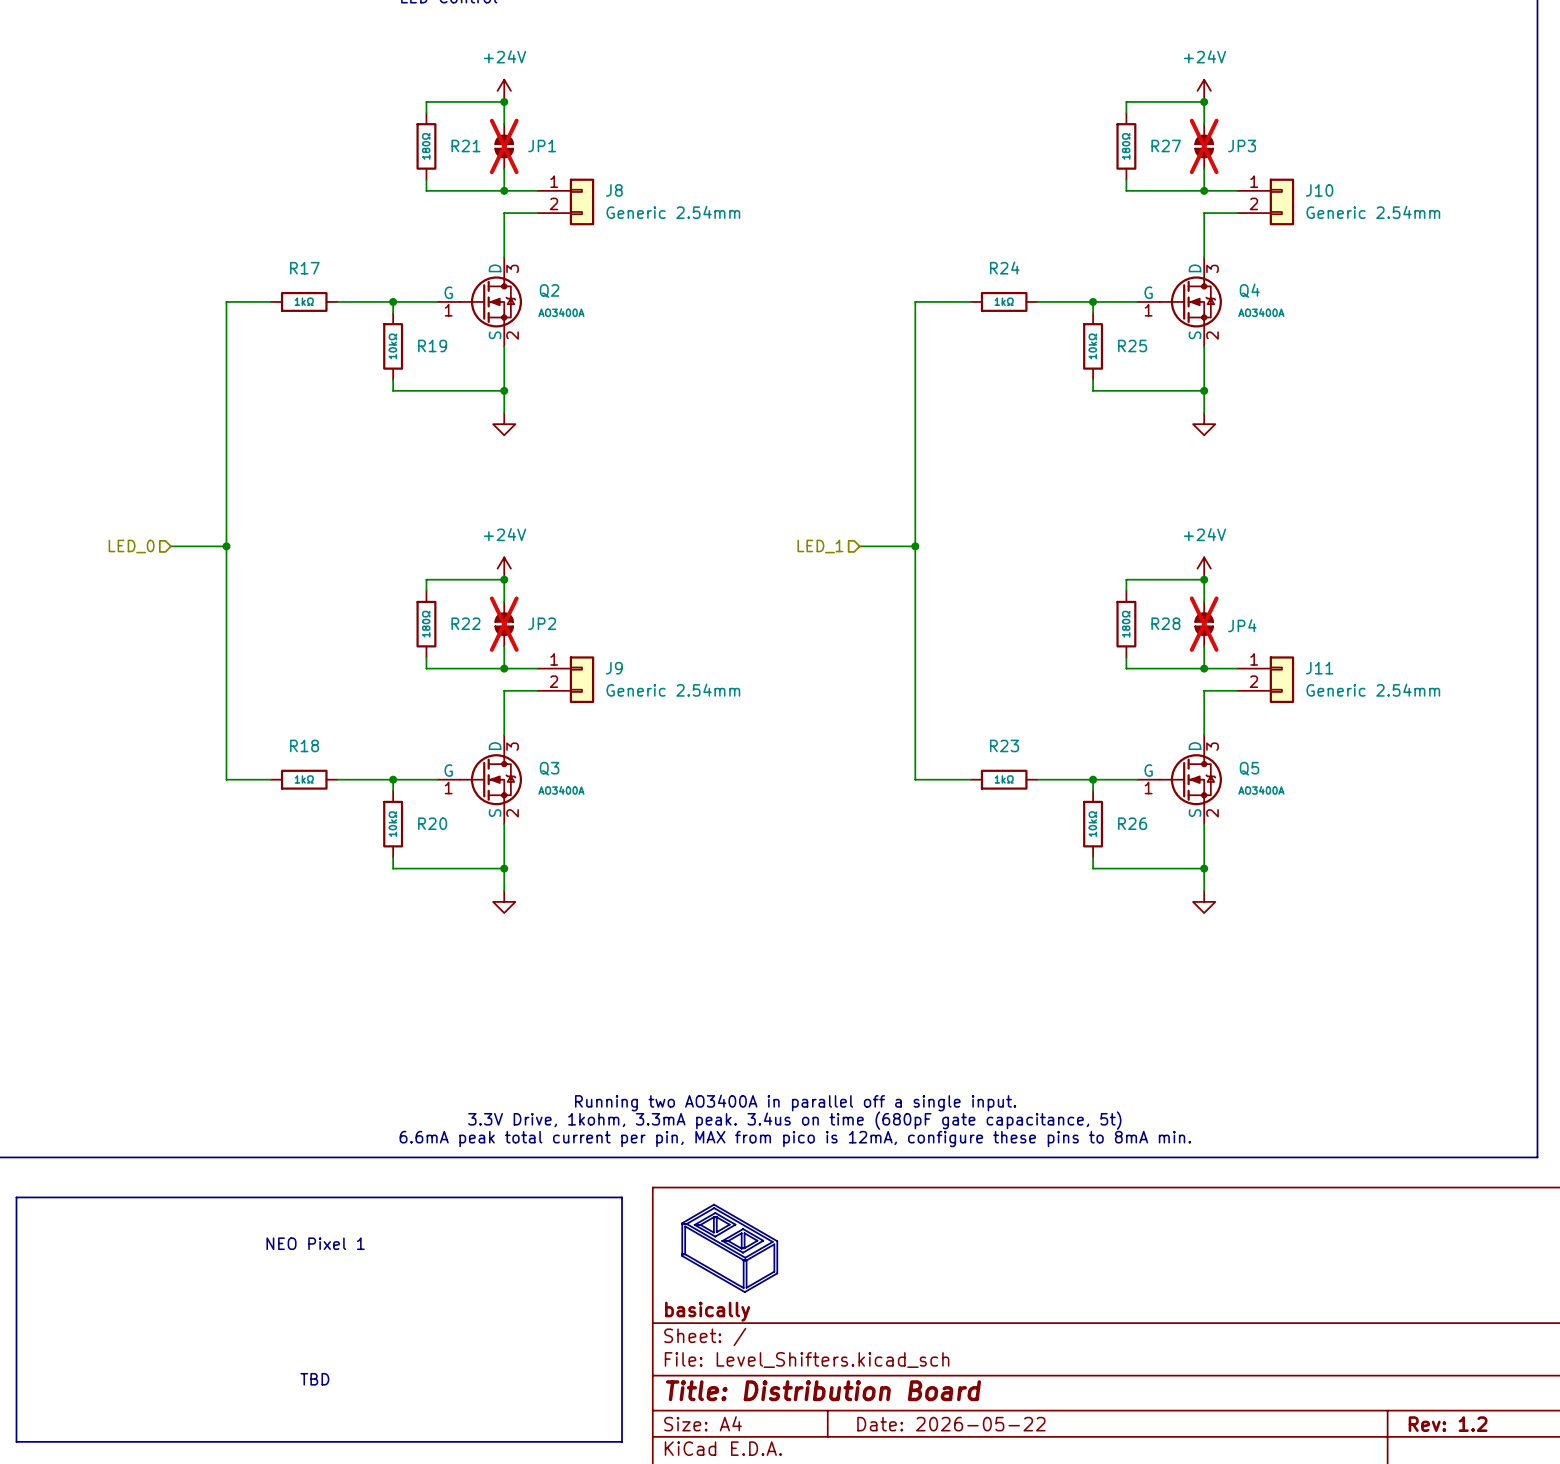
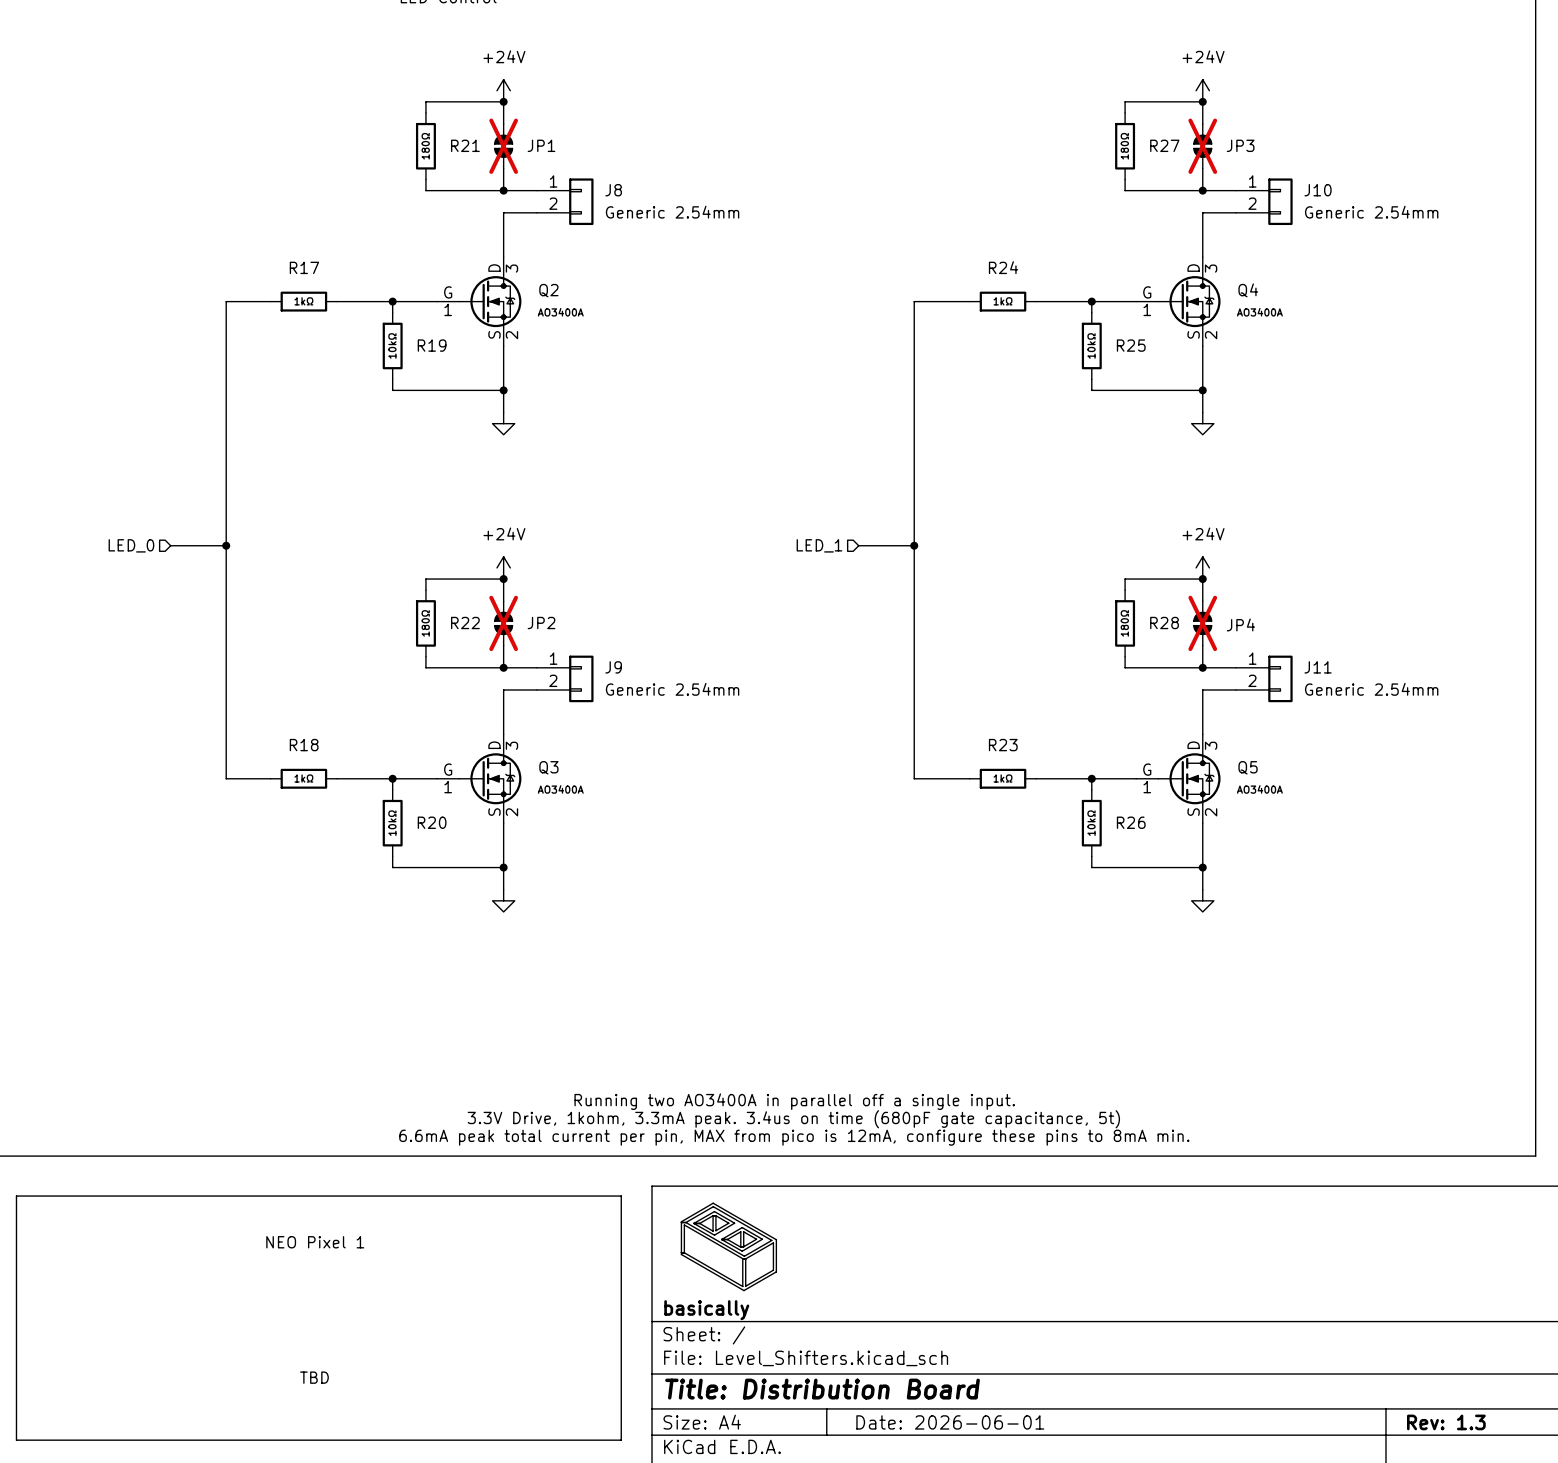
title block: Date: 2026-05-22 (951, 1424) -> Date: 2026-06-01 (950, 1422)
title block: Rev: 1.2 (1448, 1424) -> Rev: 1.3 (1446, 1422)

